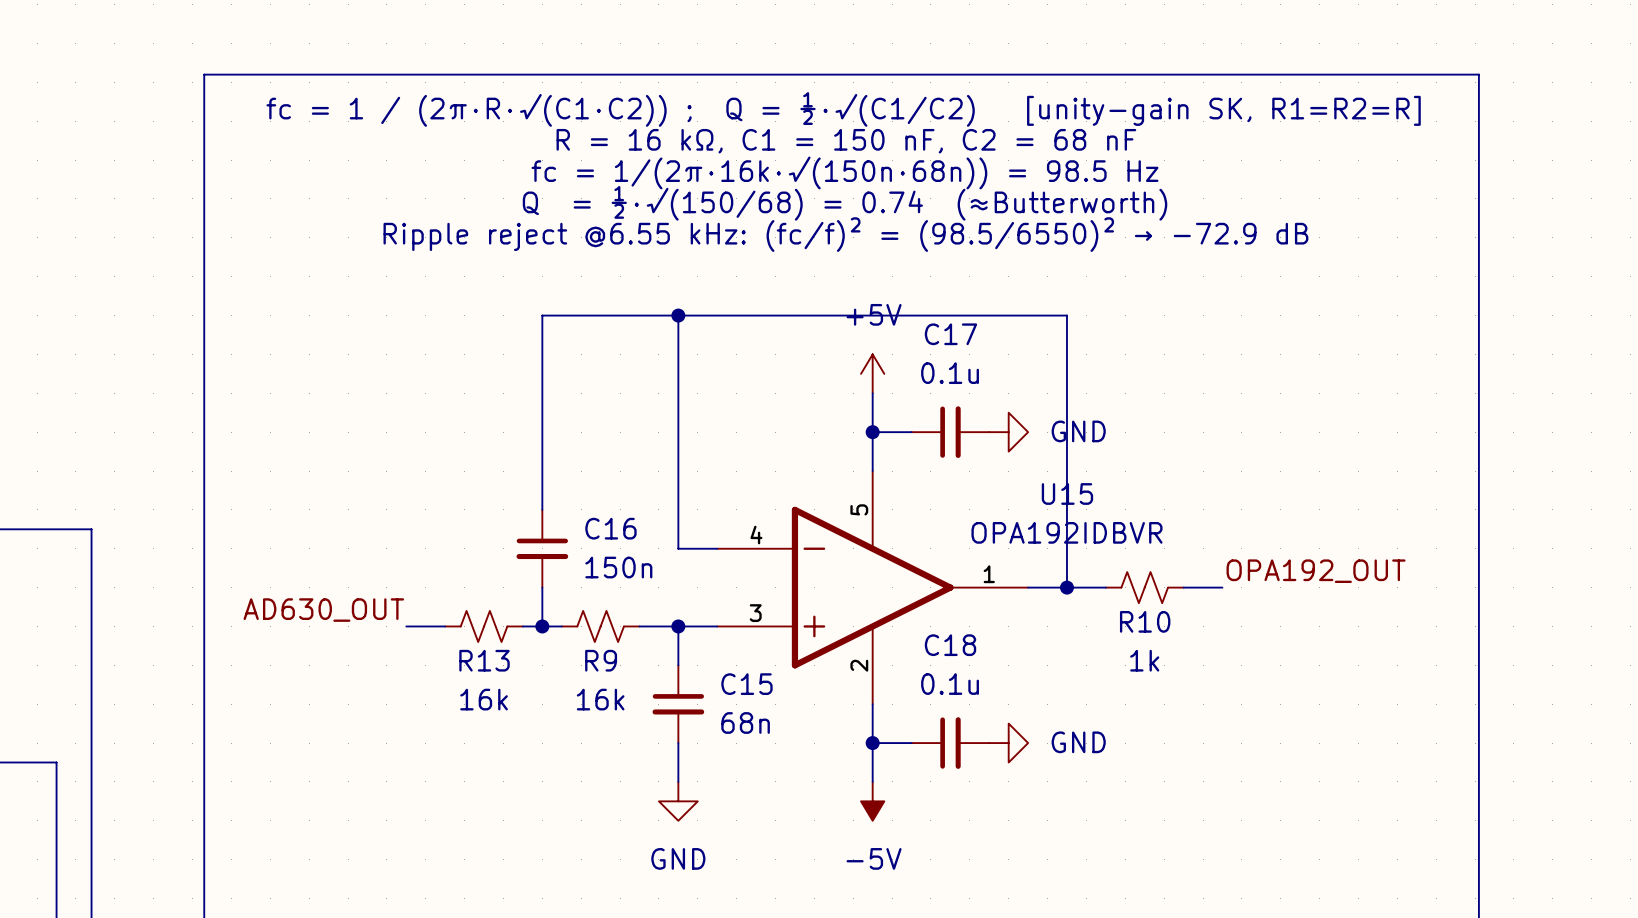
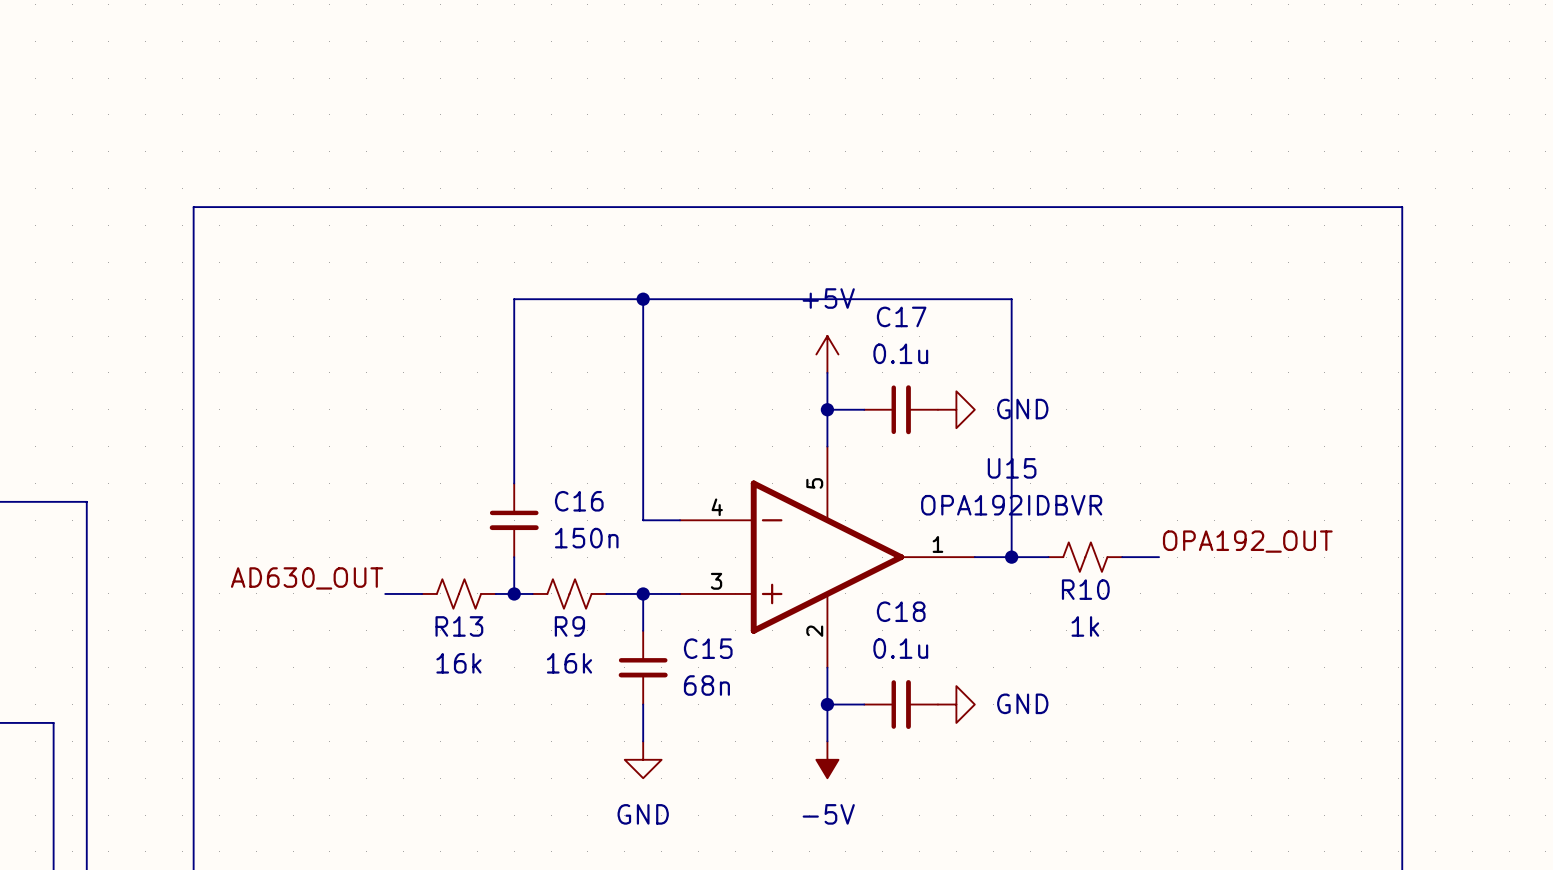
text: fc = 1 / (2π·R·√(C1·C2)) ; Q = ½·√(C1/C2) [unity-gain SK, R1=R2=R] (843, 109) -> none
text: R = 16 kΩ, C1 = 150 nF, C2 = 68 nF (846, 141) -> none
text: fc = 1/(2π·16k·√(150n·68n)) = 98.5 Hz (845, 172) -> none
text: Q = ½·√(150/68) = 0.74 (≈Butterworth) (845, 203) -> none
line: (204, 218) (204, 74) (1478, 74) (1478, 218) -> (193, 207) (1402, 207)
text: Ripple reject @6.55 kHz: (fc/f)² = (98.5/6550)² → −72.9 dB (845, 234) -> none

